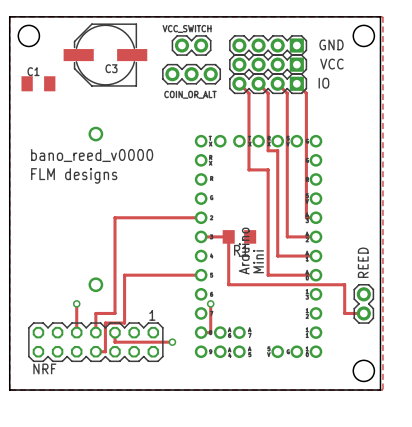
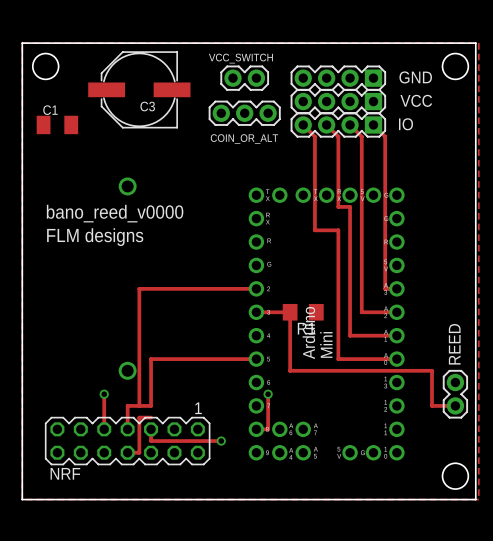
track: (115, 217) (115, 275) -> (151, 288) (139, 288) (139, 405)
track: (124, 275) (124, 323) (115, 323) -> (162, 359) (151, 359)

